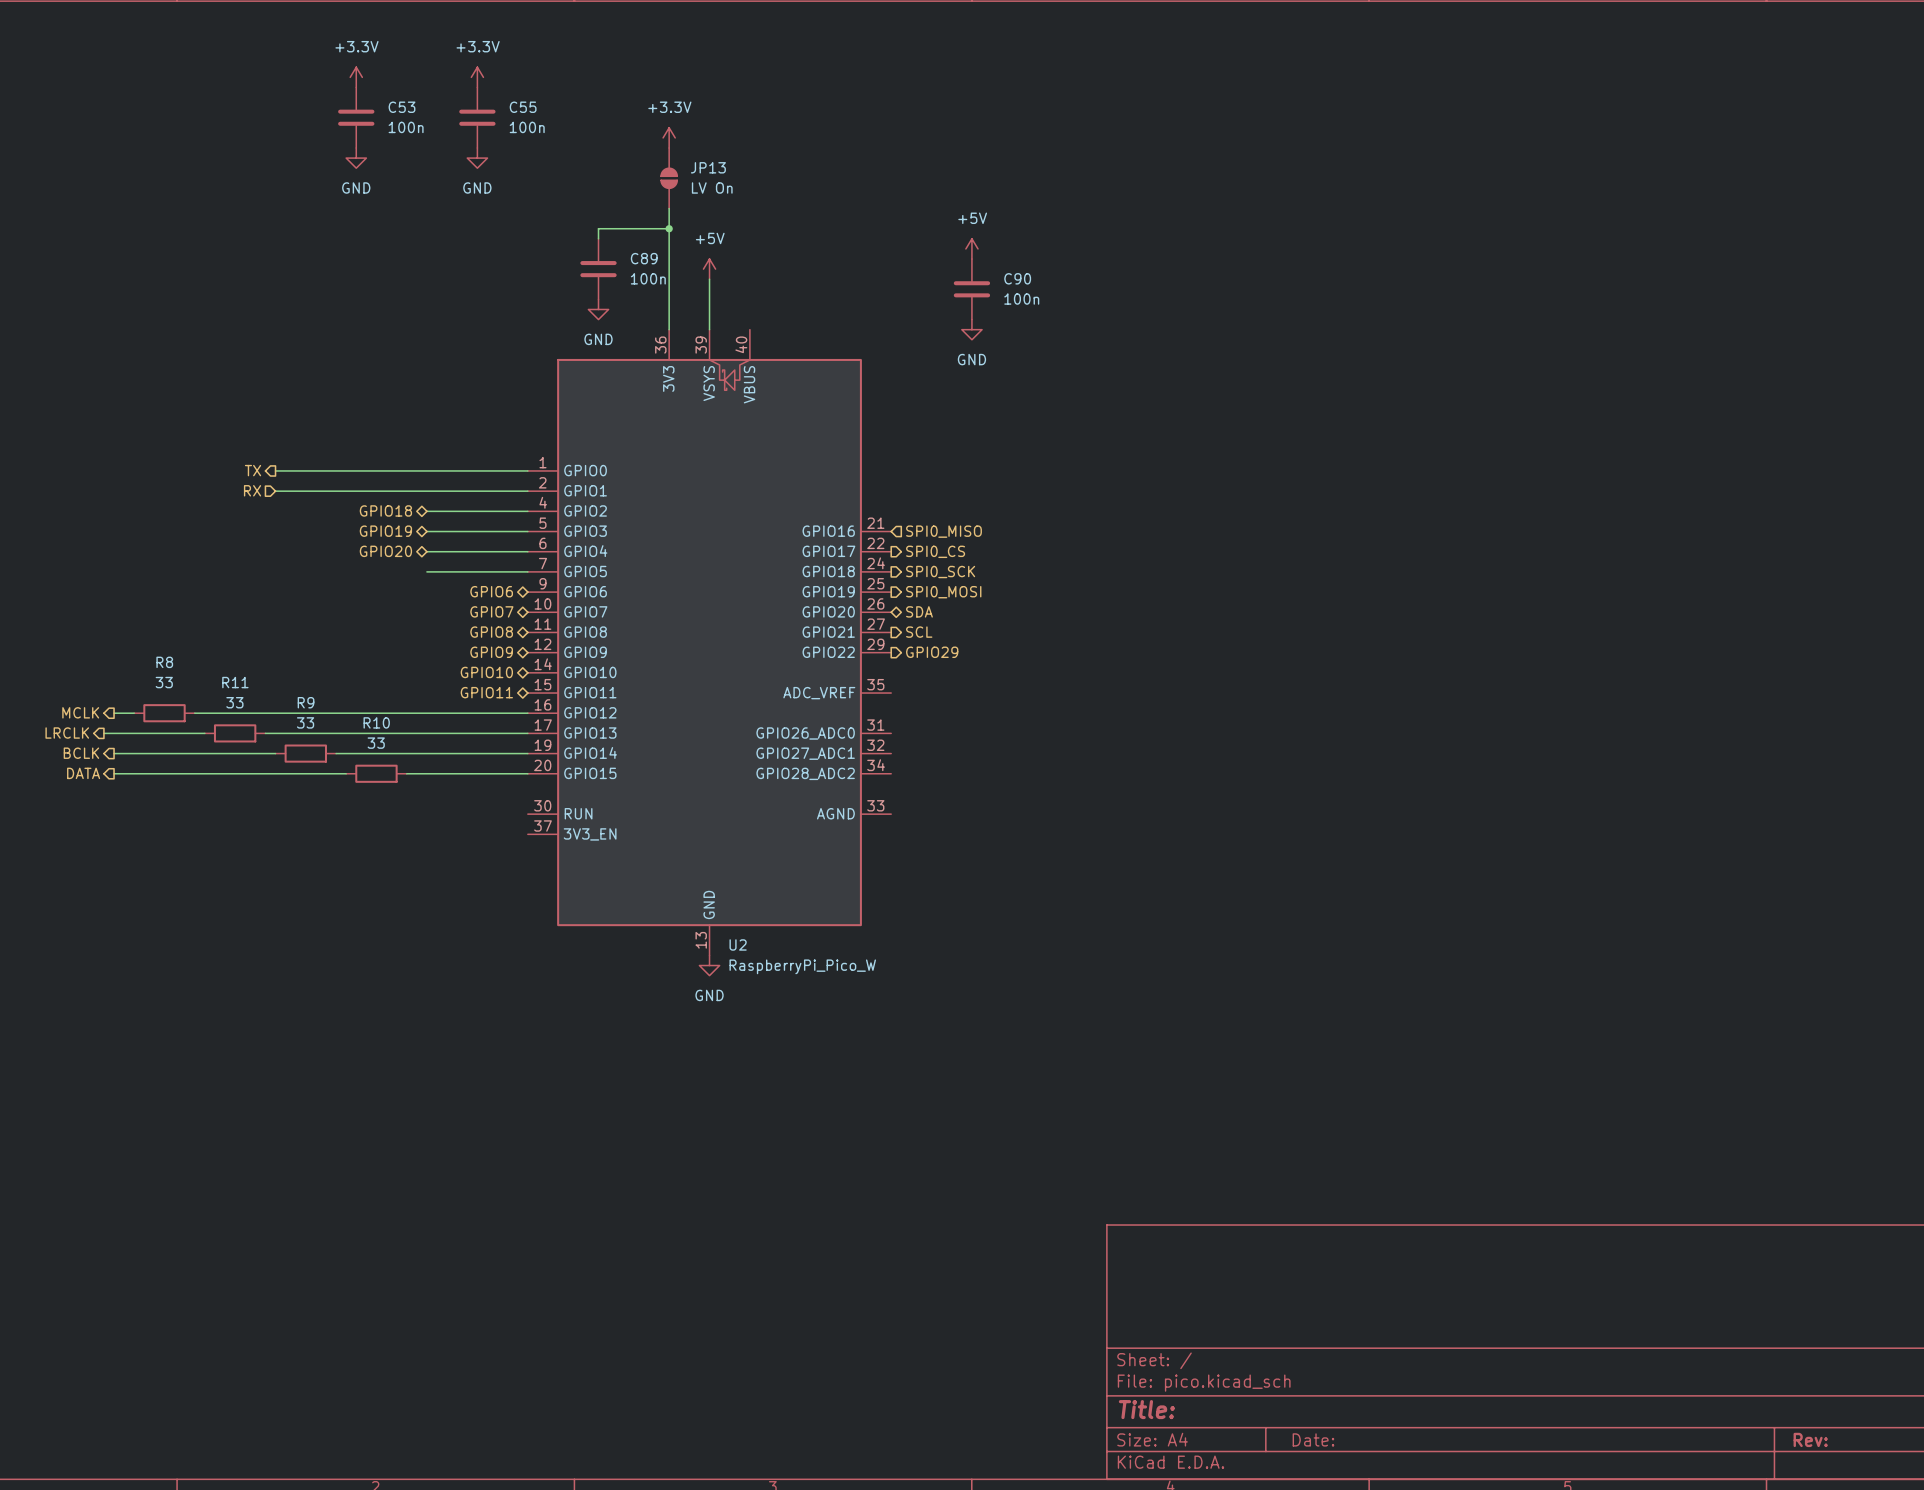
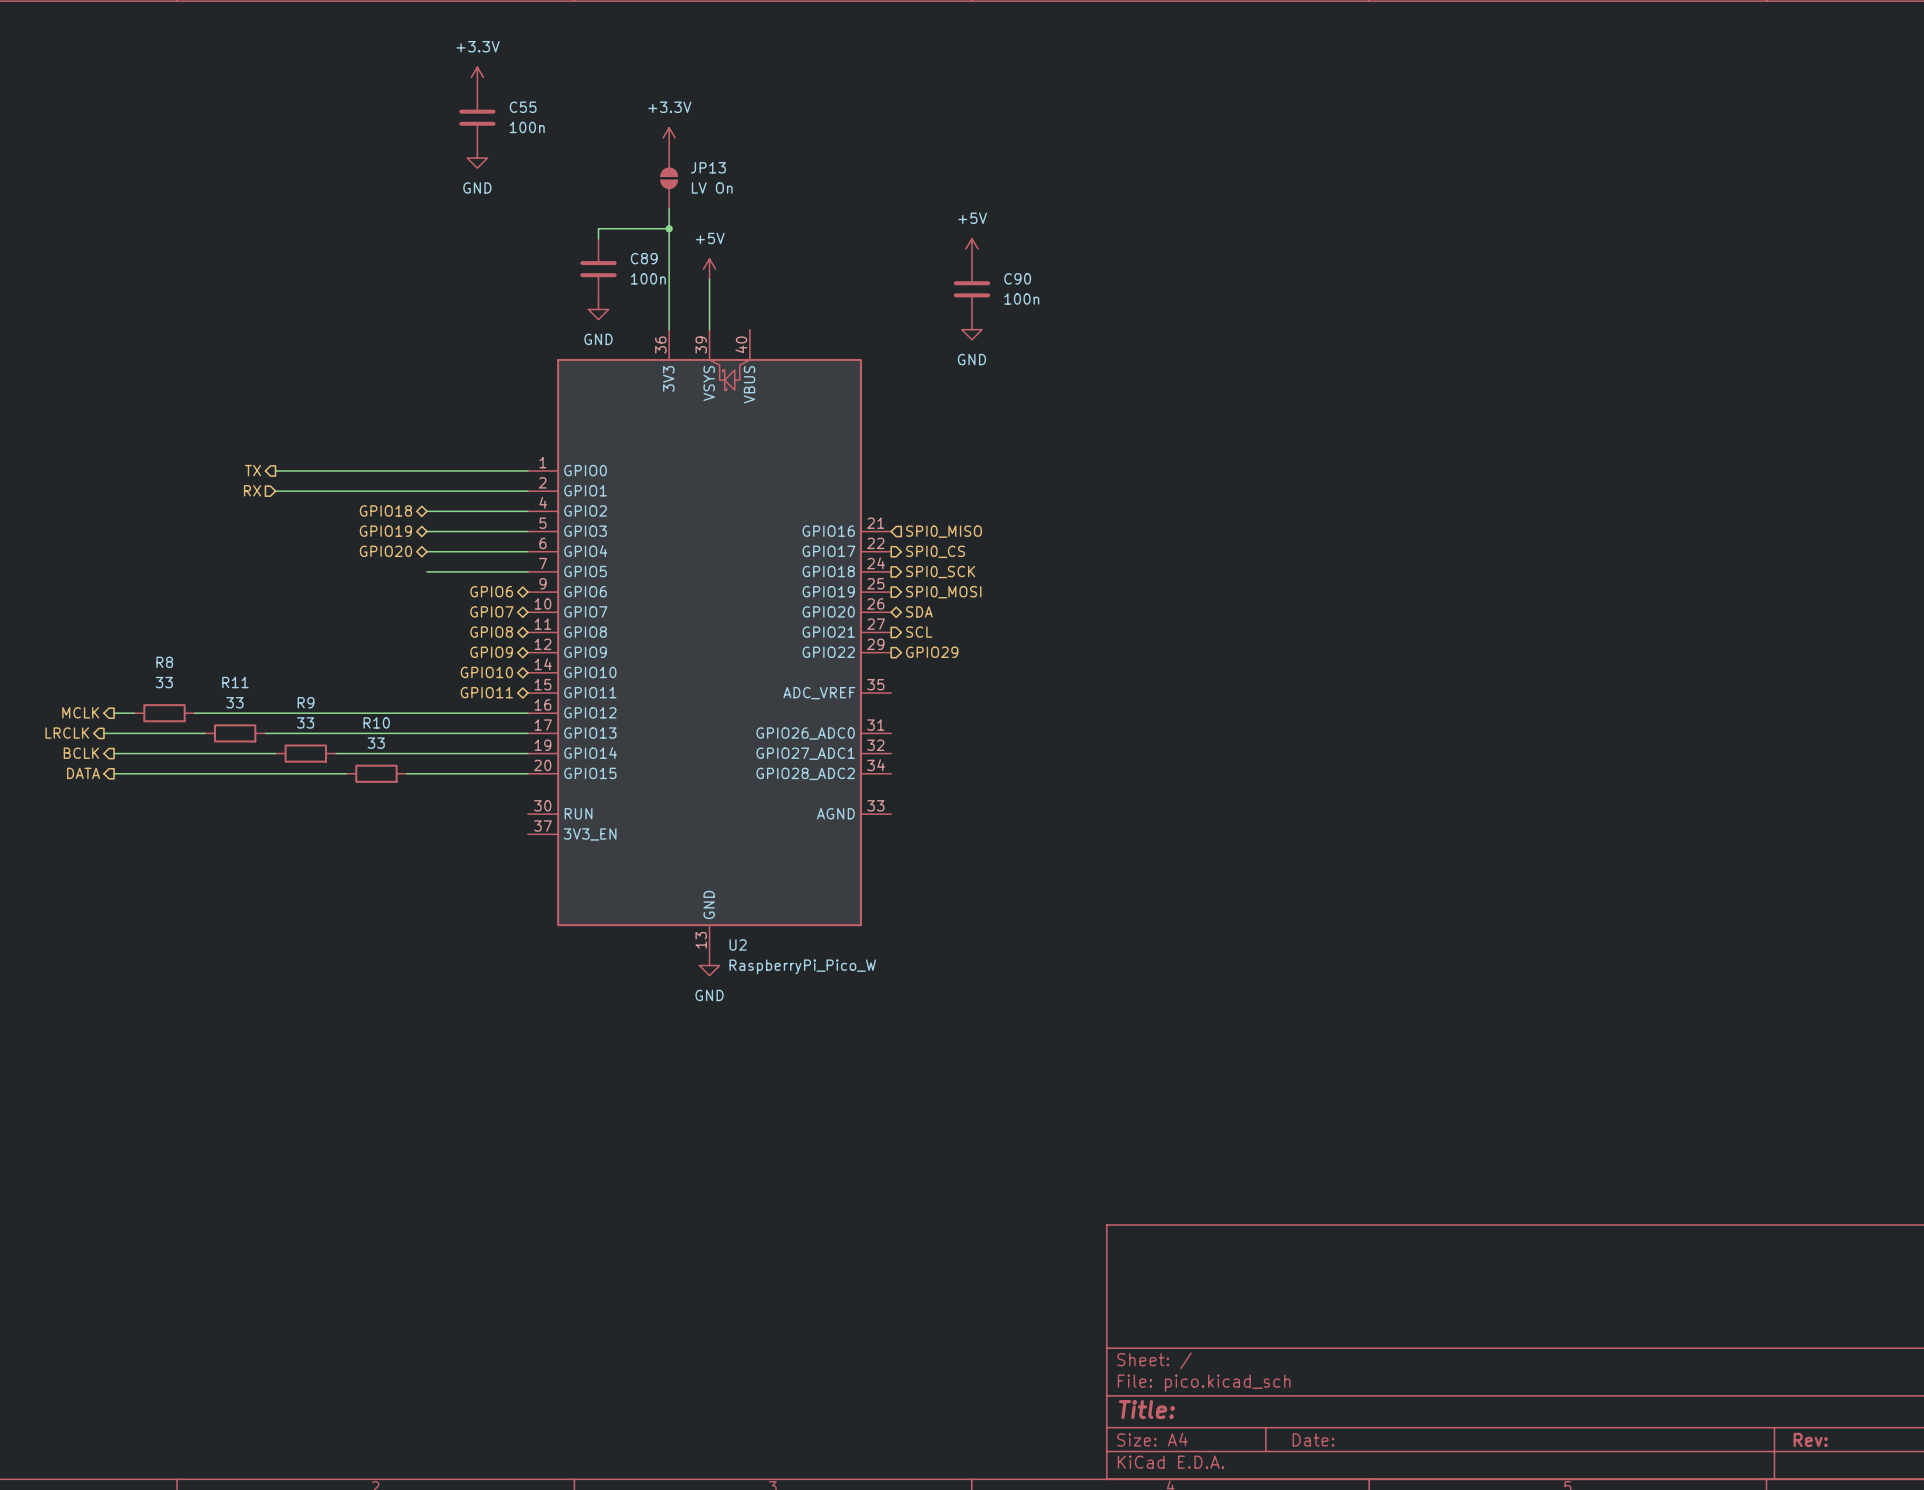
power symbol: +3.3V (356, 77) -> none
C53: 100n (356, 117) -> none
power symbol: GND (356, 158) -> none

